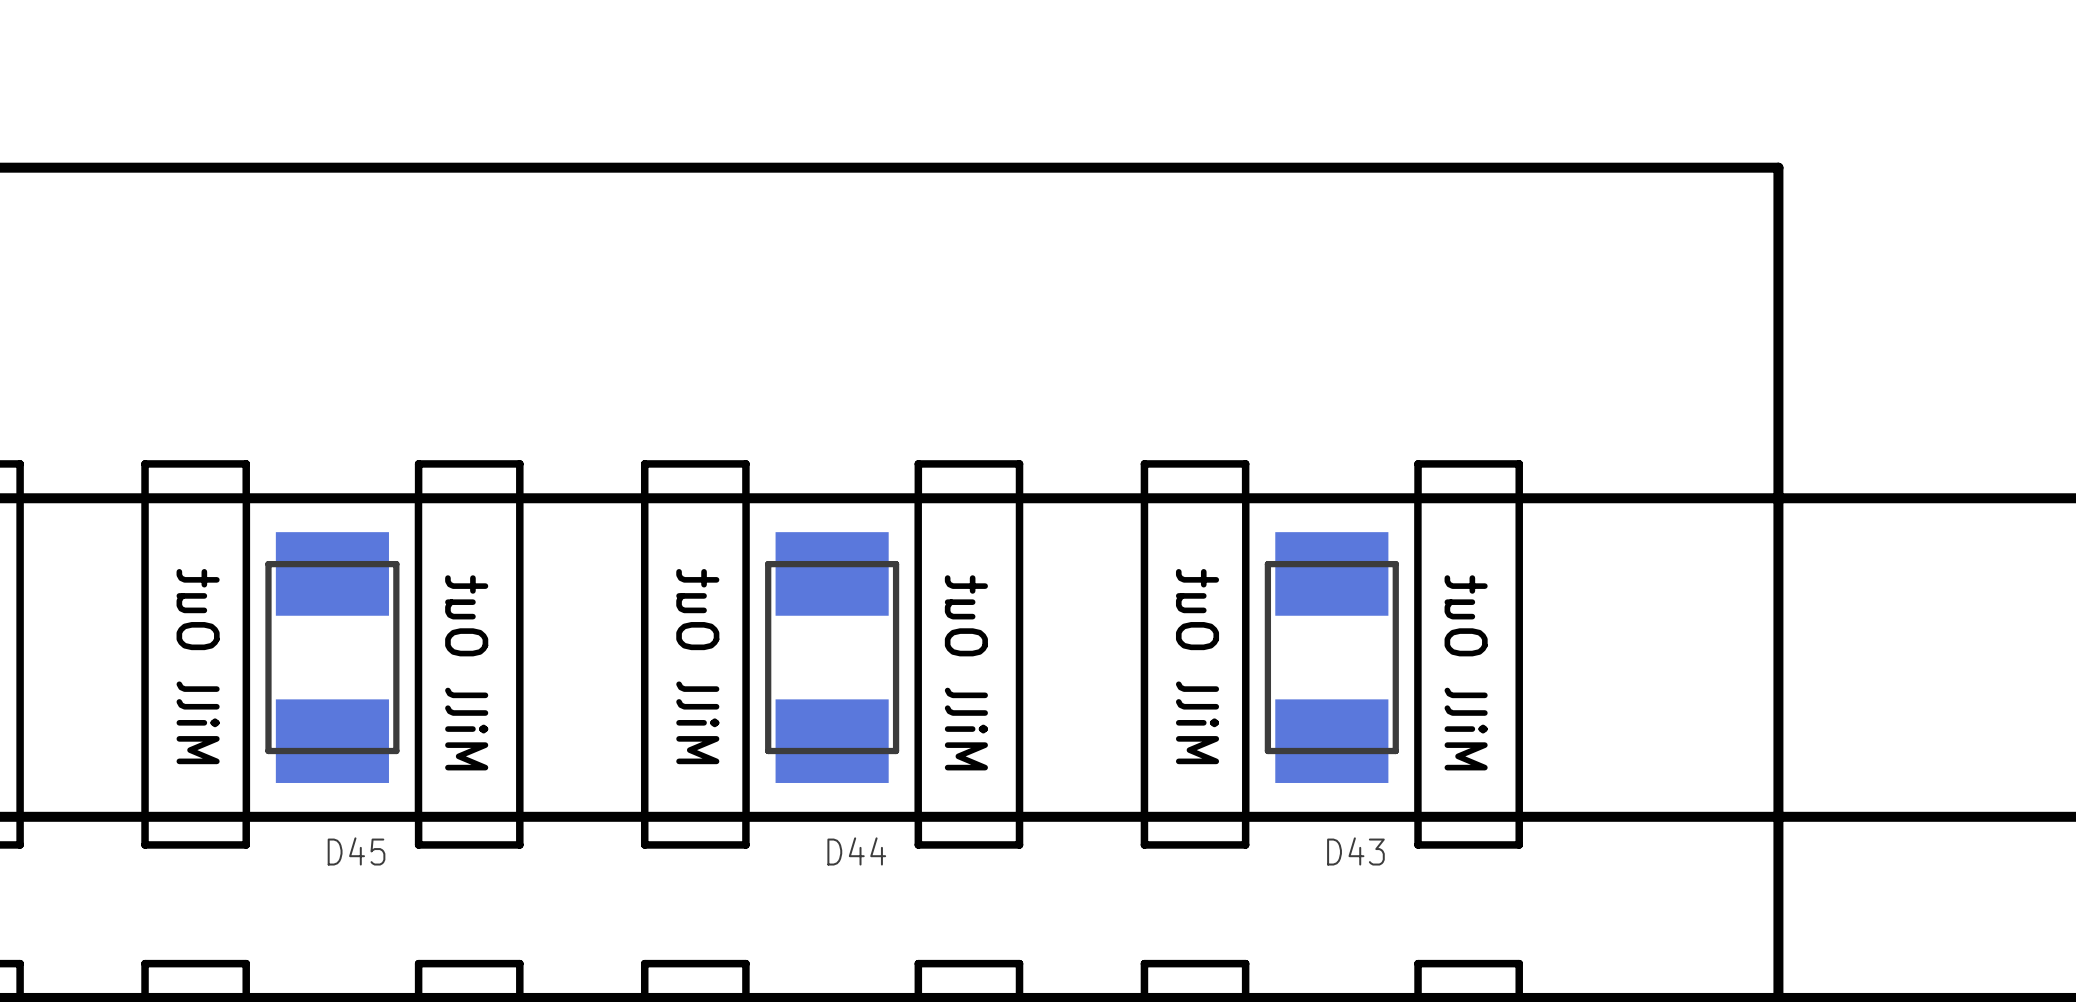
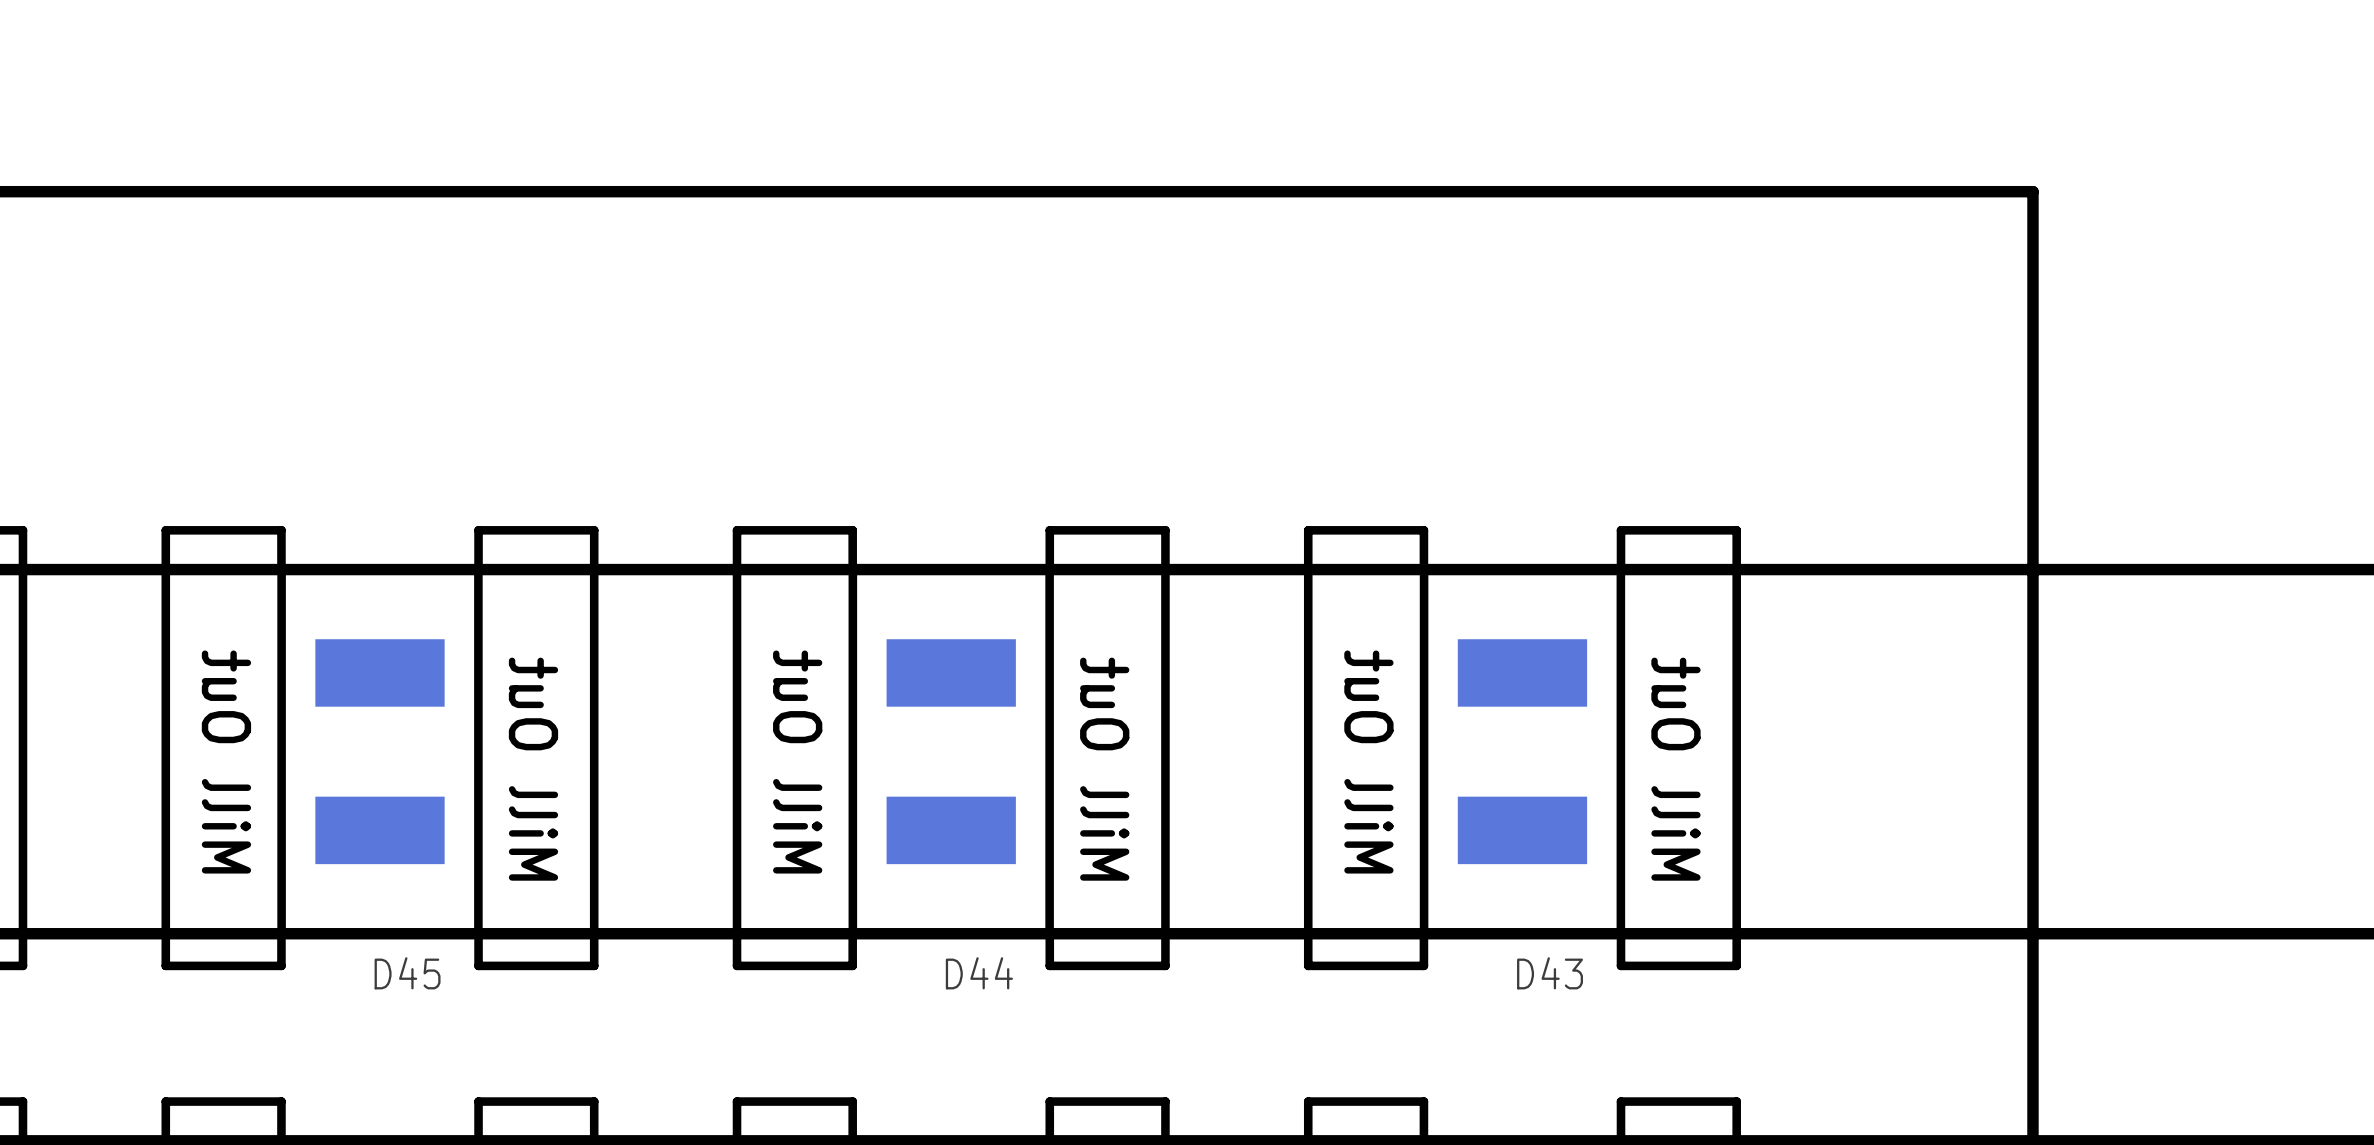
D45 footprint: [265, 532, 400, 783] -> [315, 639, 445, 865]
D44 footprint: [765, 532, 900, 783] -> [886, 639, 1016, 865]
D43 footprint: [1264, 532, 1399, 783] -> [1457, 639, 1588, 865]

